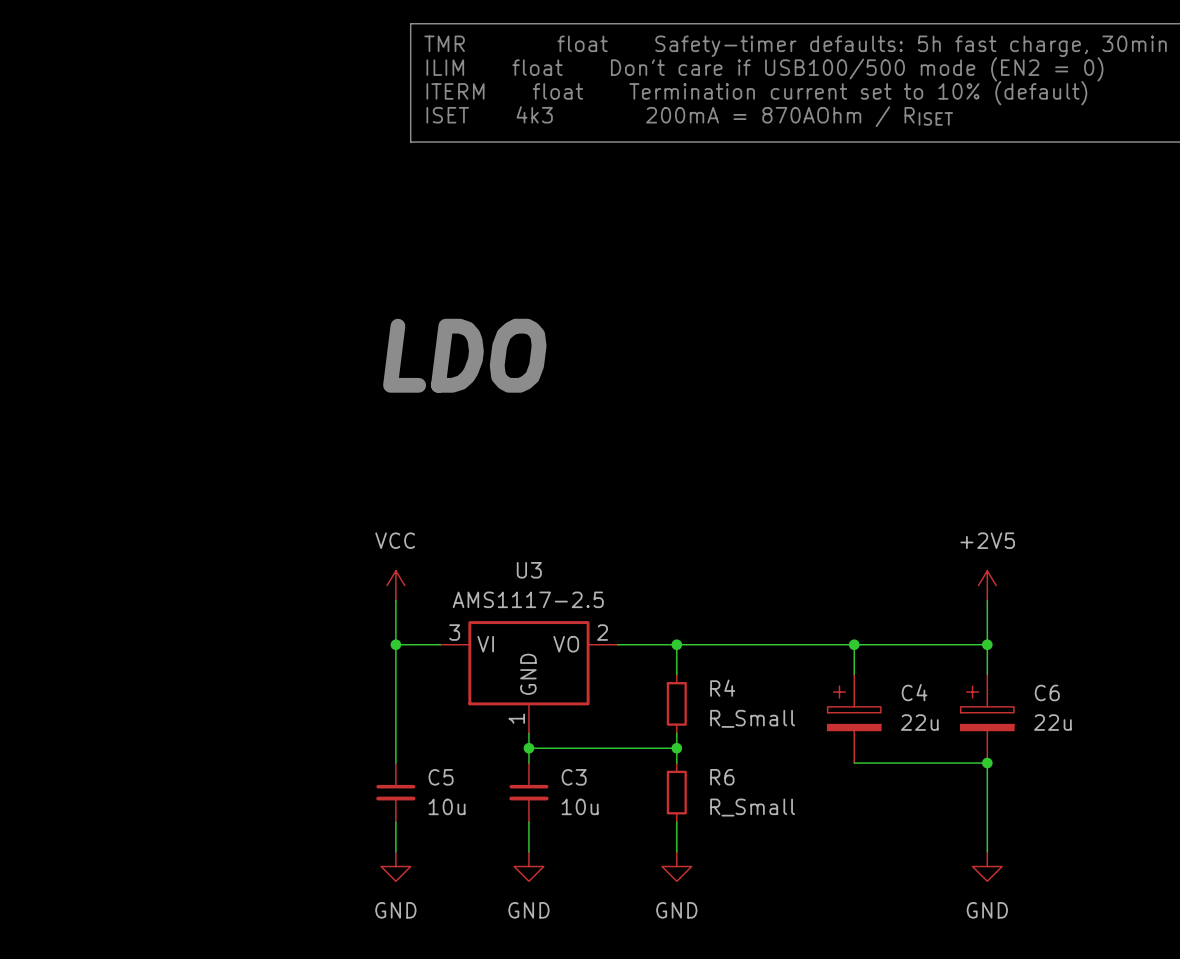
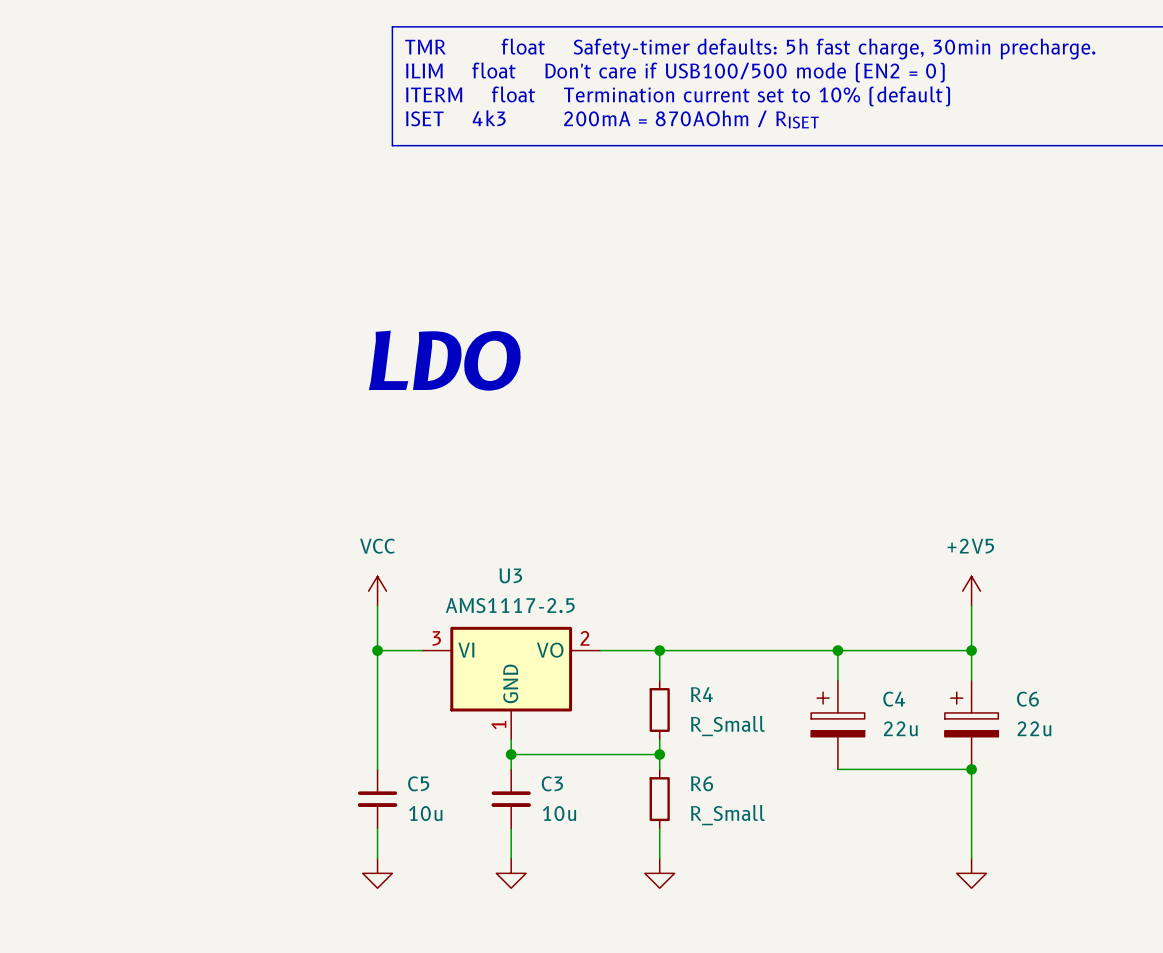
power symbol text: GND (395, 910) -> none
power symbol text: GND (528, 910) -> none
power symbol text: GND (676, 910) -> none
power symbol text: GND (987, 910) -> none

